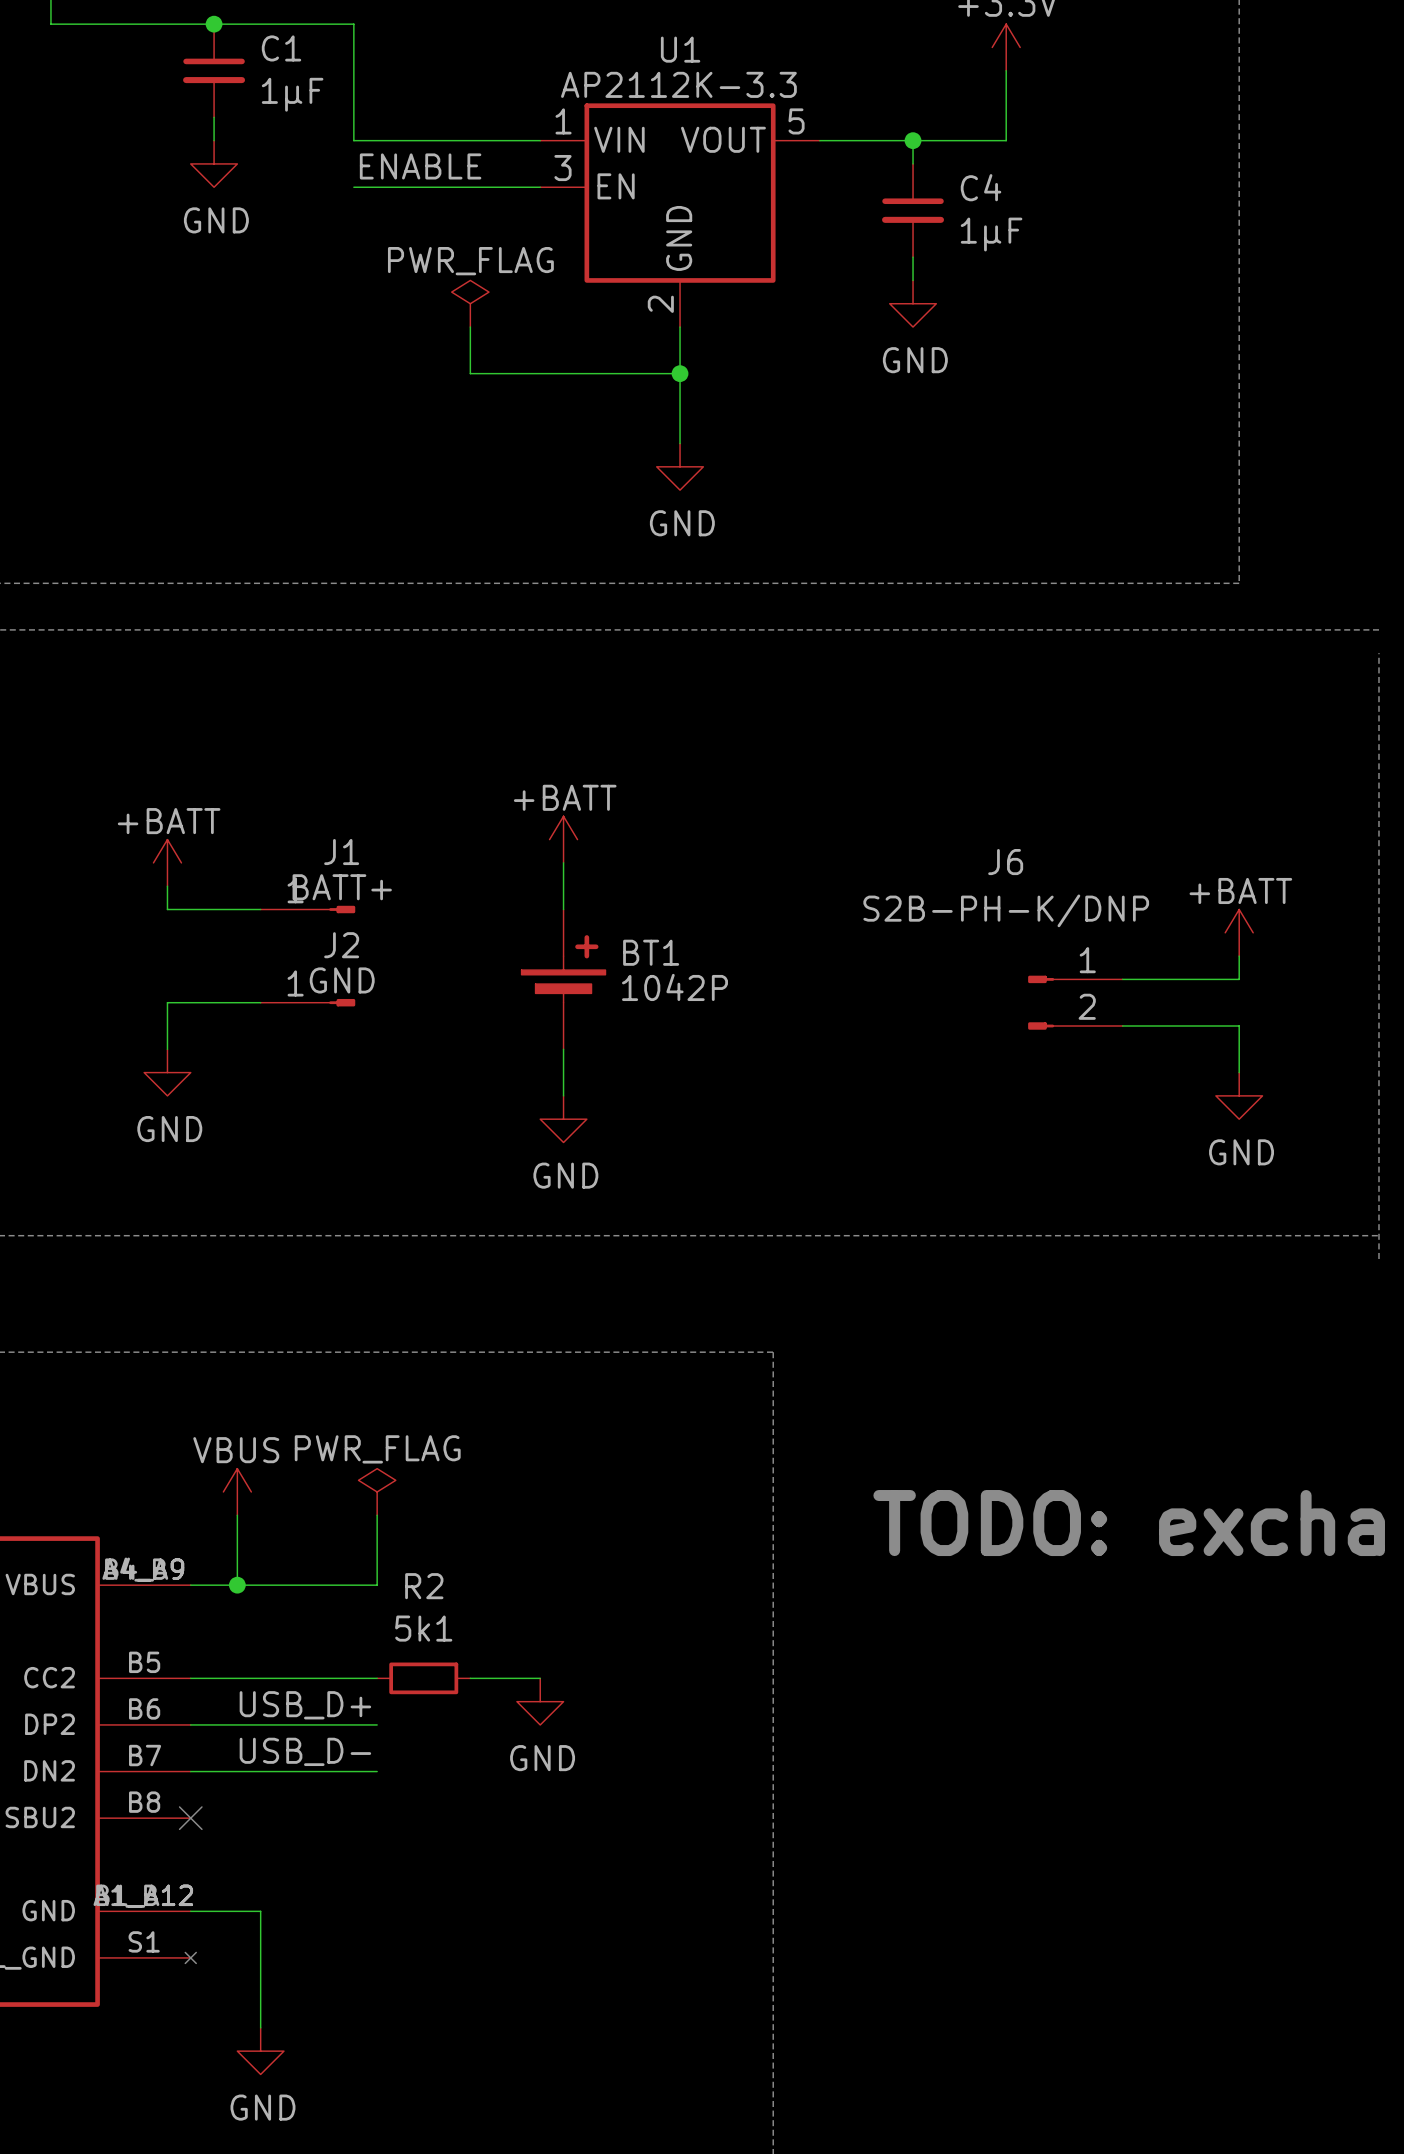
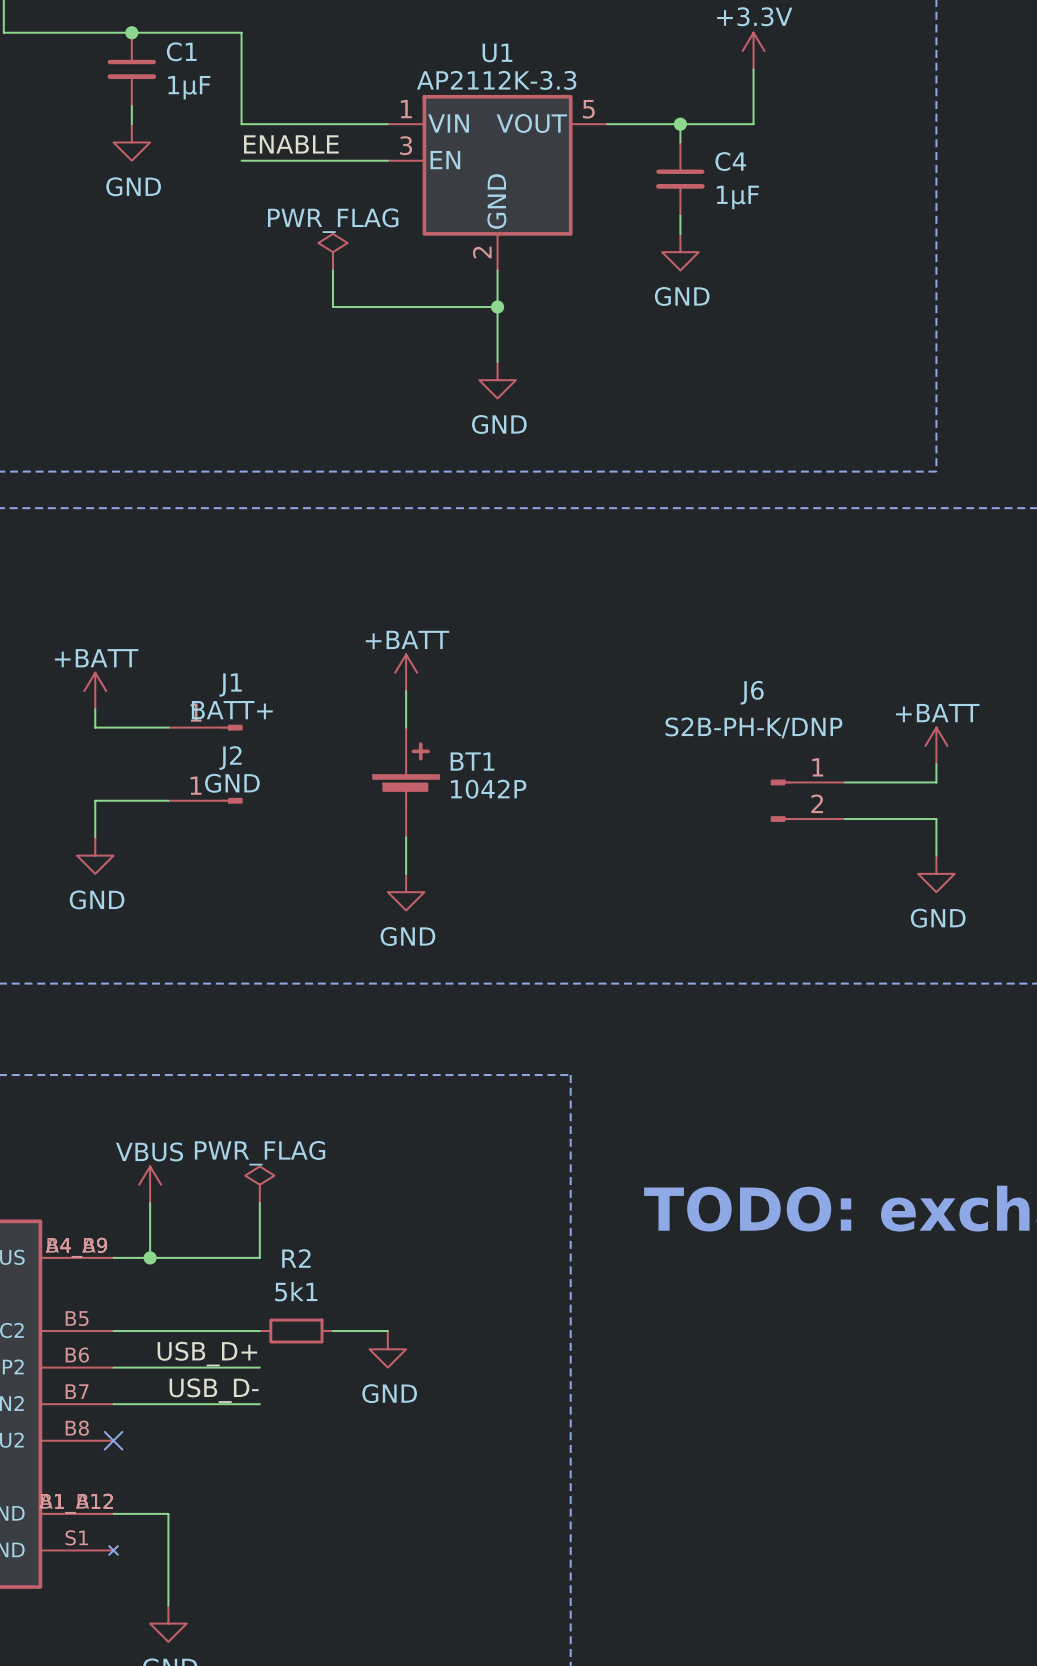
BT1 symbol: [521, 909, 606, 1050] -> [373, 727, 440, 838]

